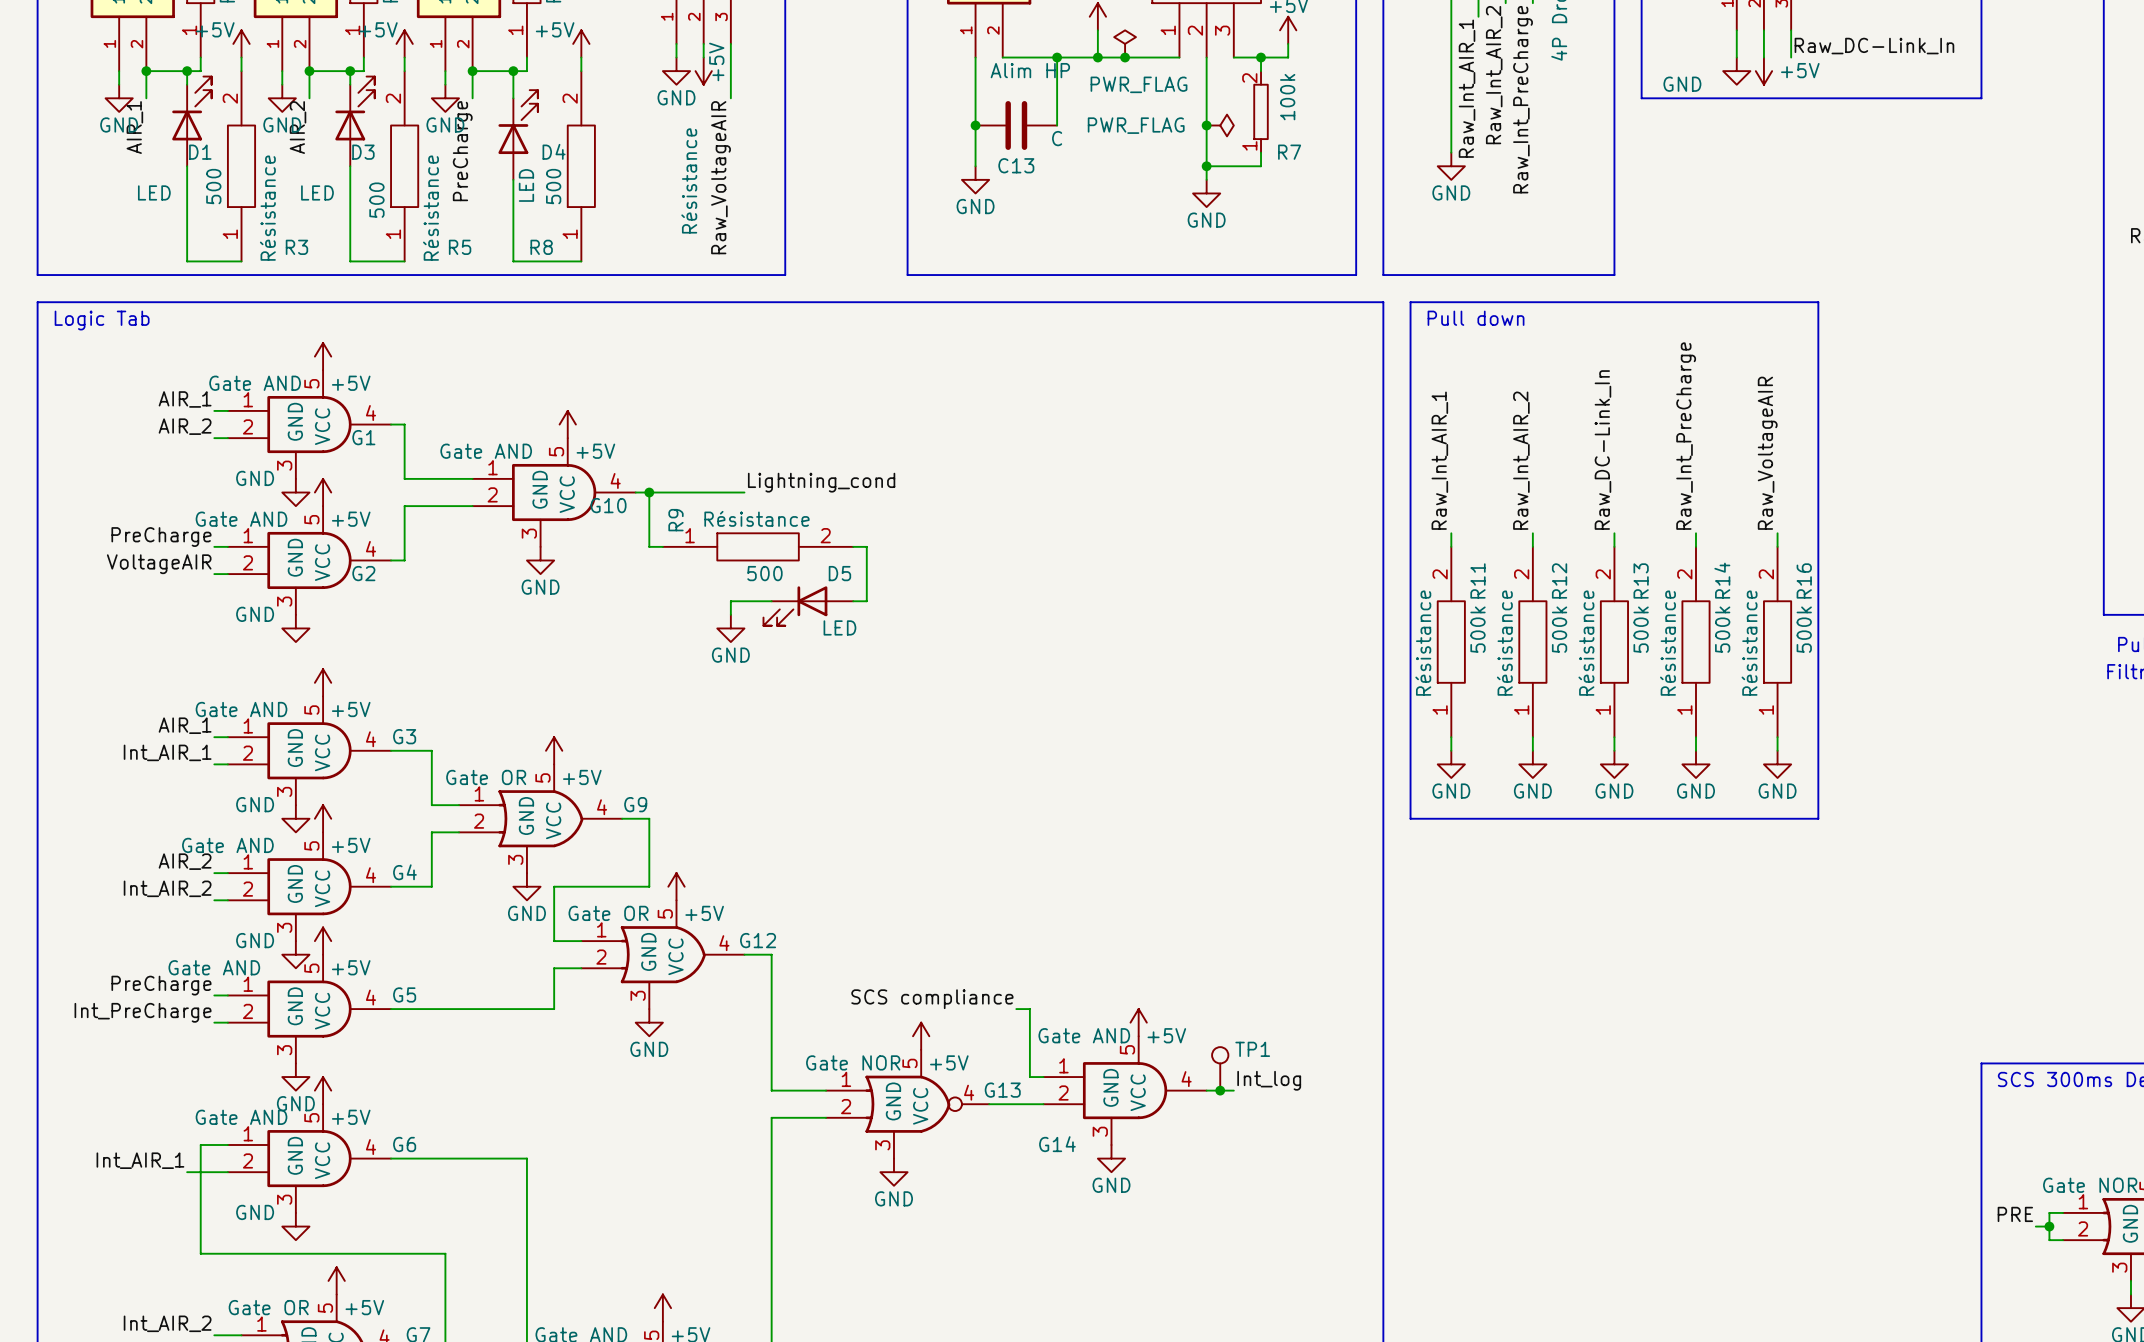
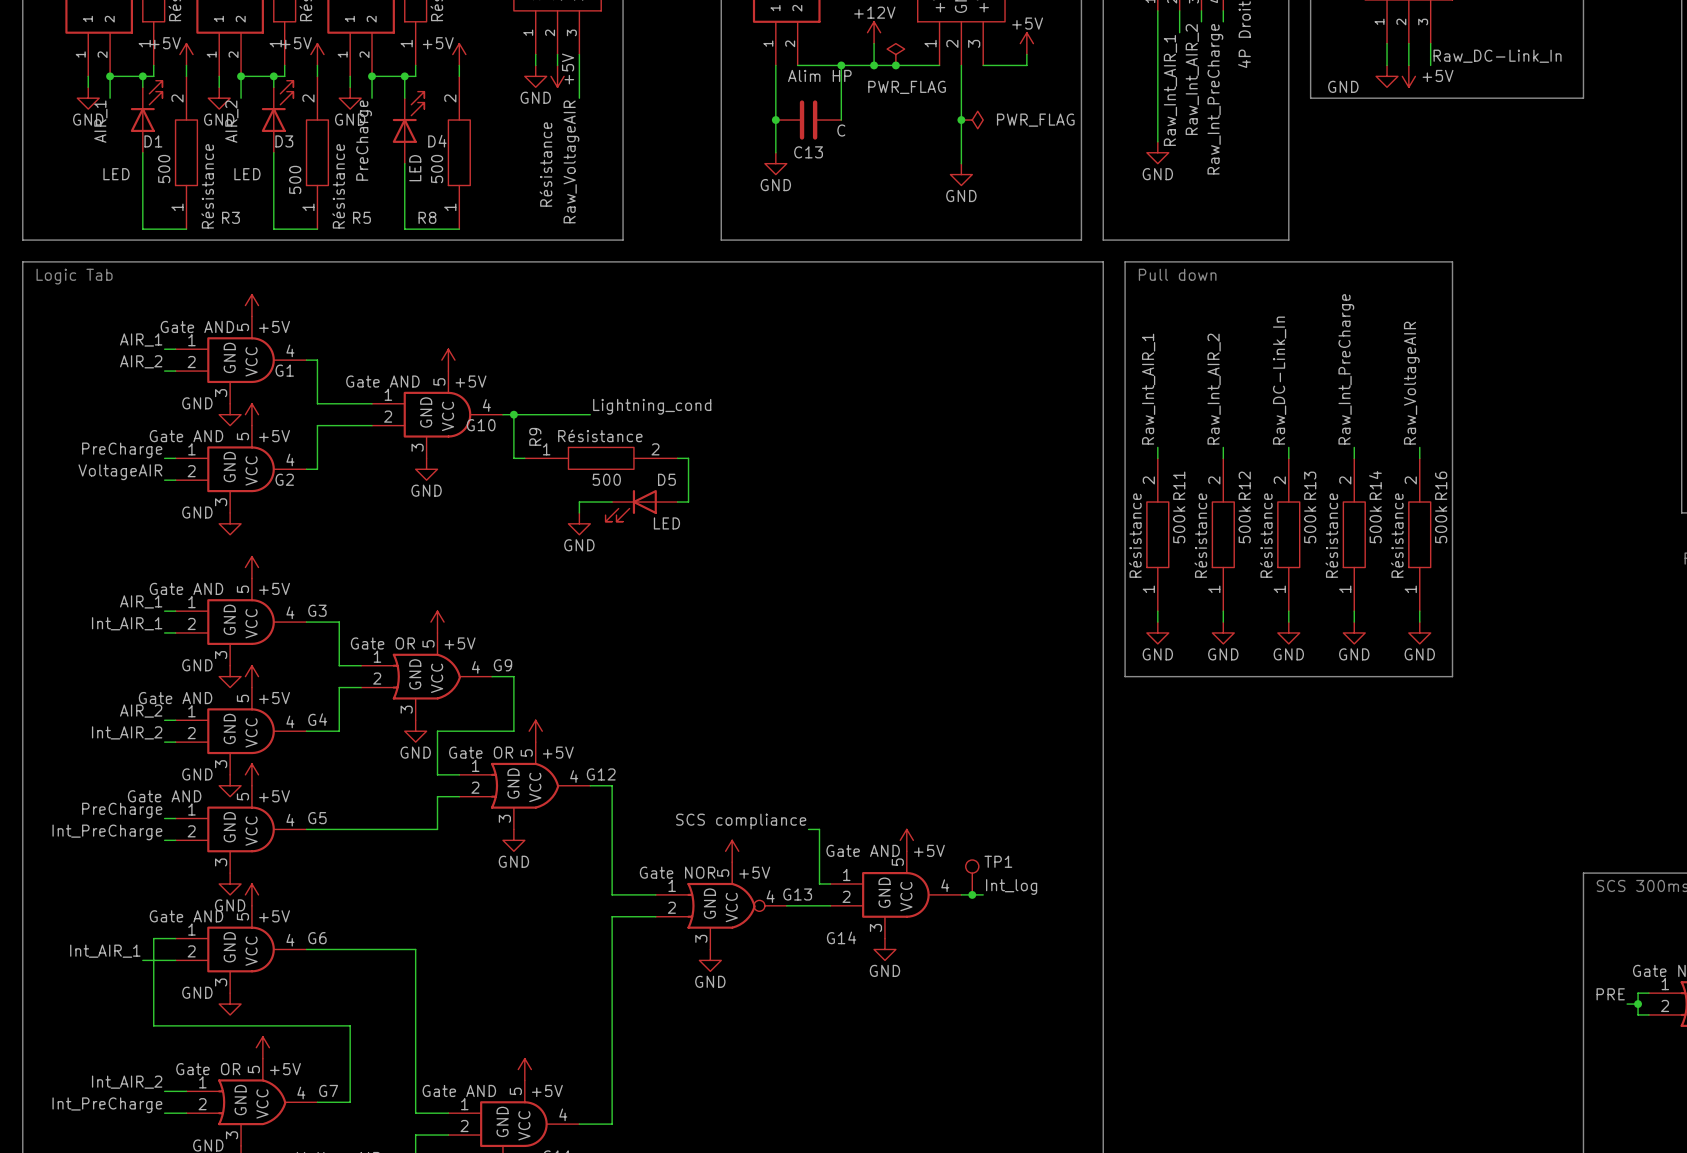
wire: (1261, 57) (1261, 71) -> none
junction: (1261, 57) -> none
R7: 100k (1261, 111) -> none
power symbol text position: PWR_FLAG (1136, 125) -> PWR_FLAG (1035, 120)
wire: (1261, 152) (1261, 166) (1206, 166) -> none
junction: (1206, 166) -> none

